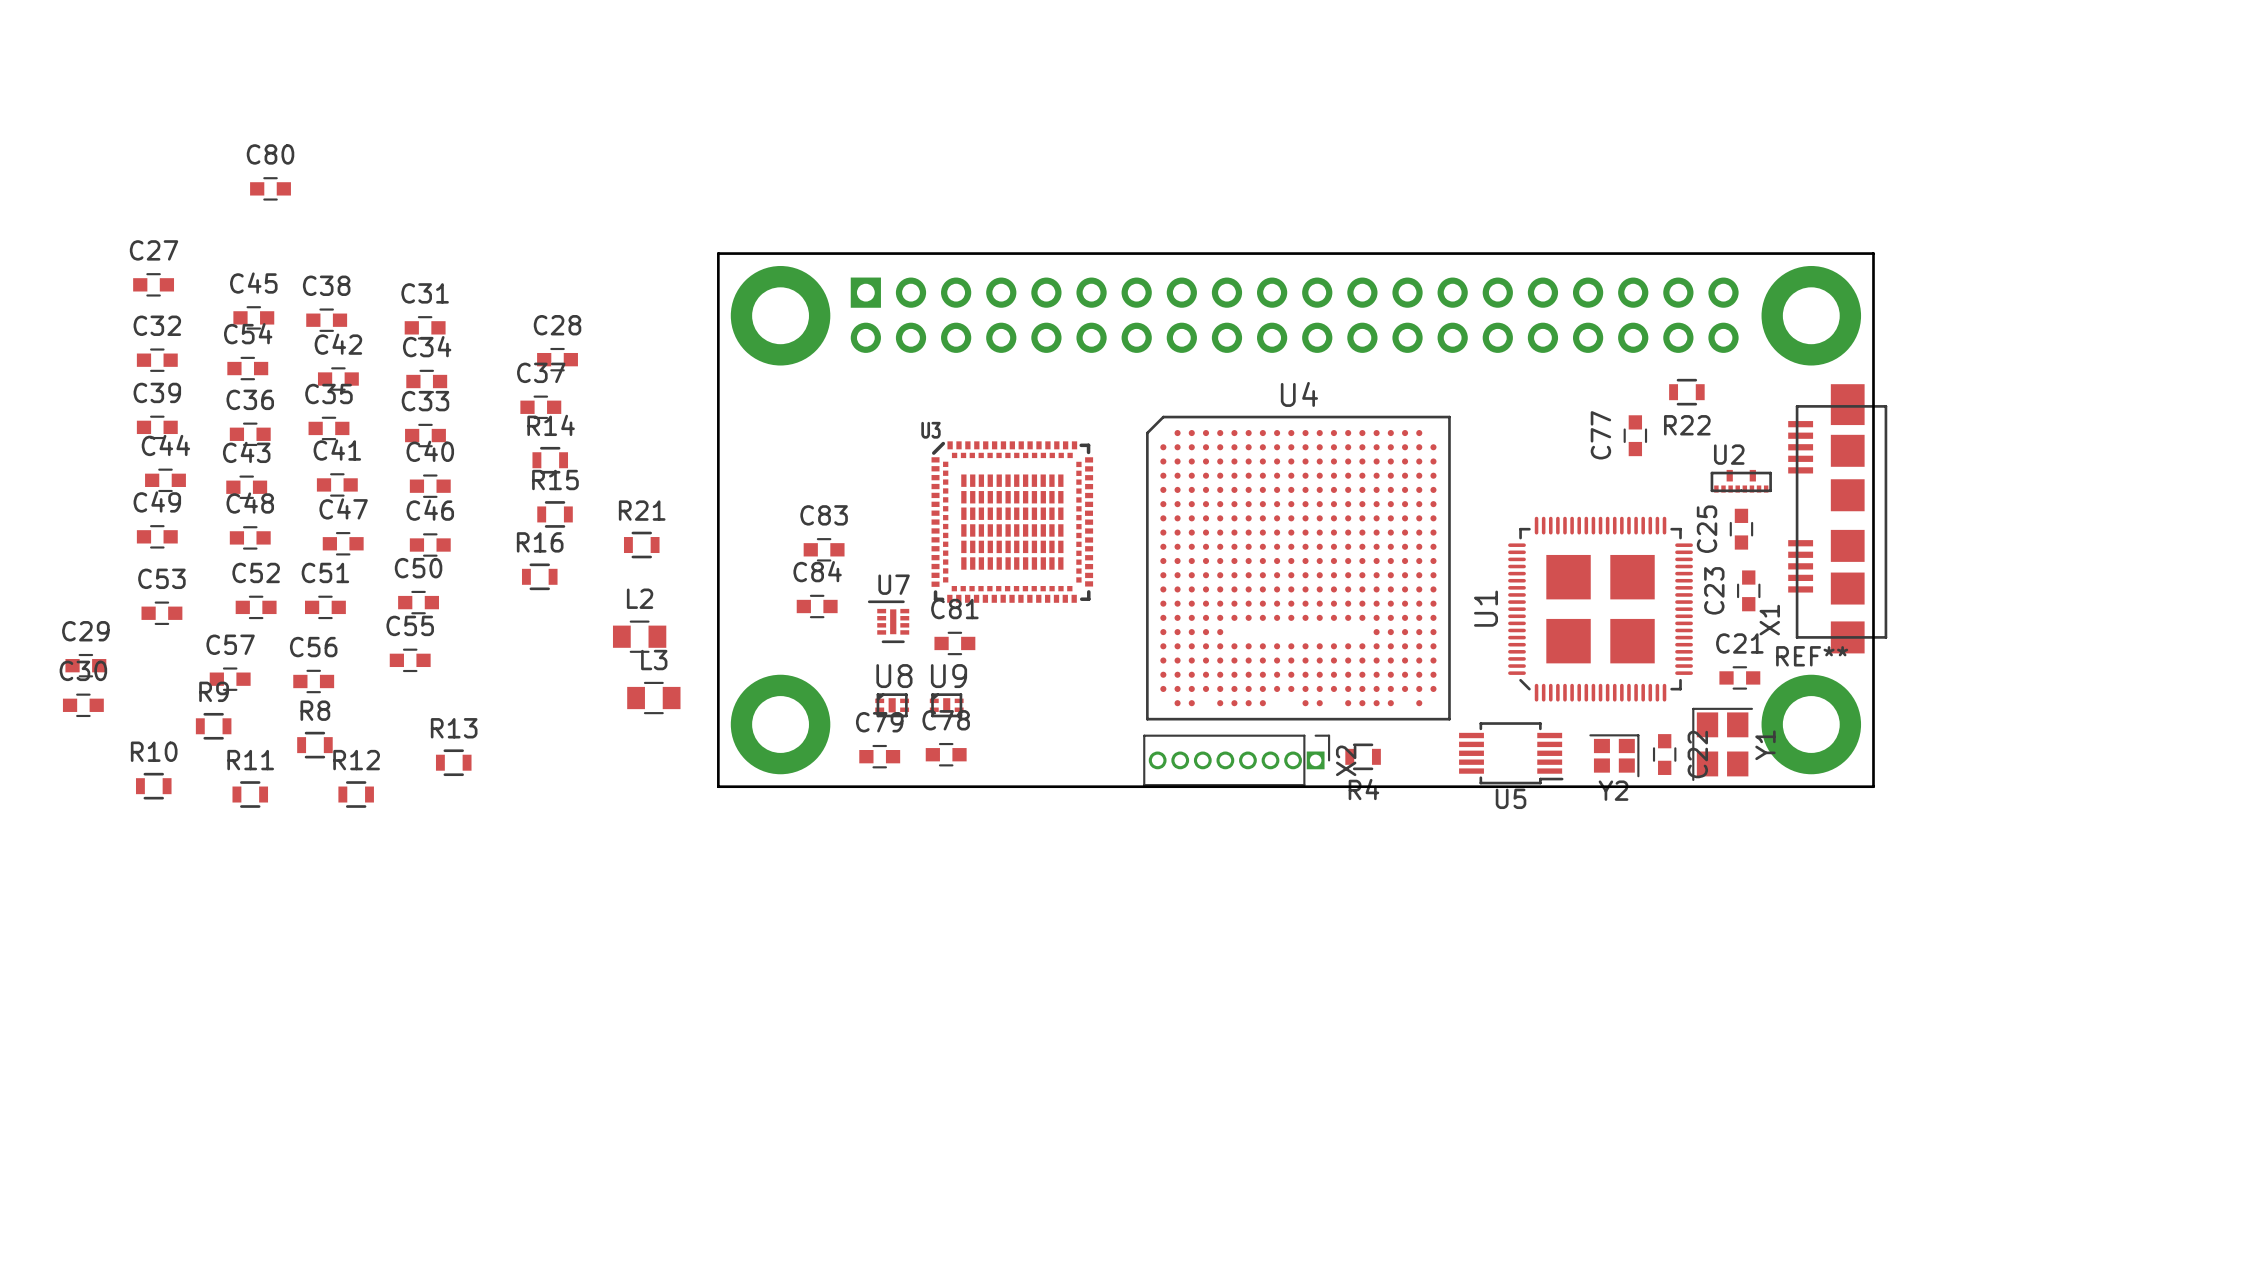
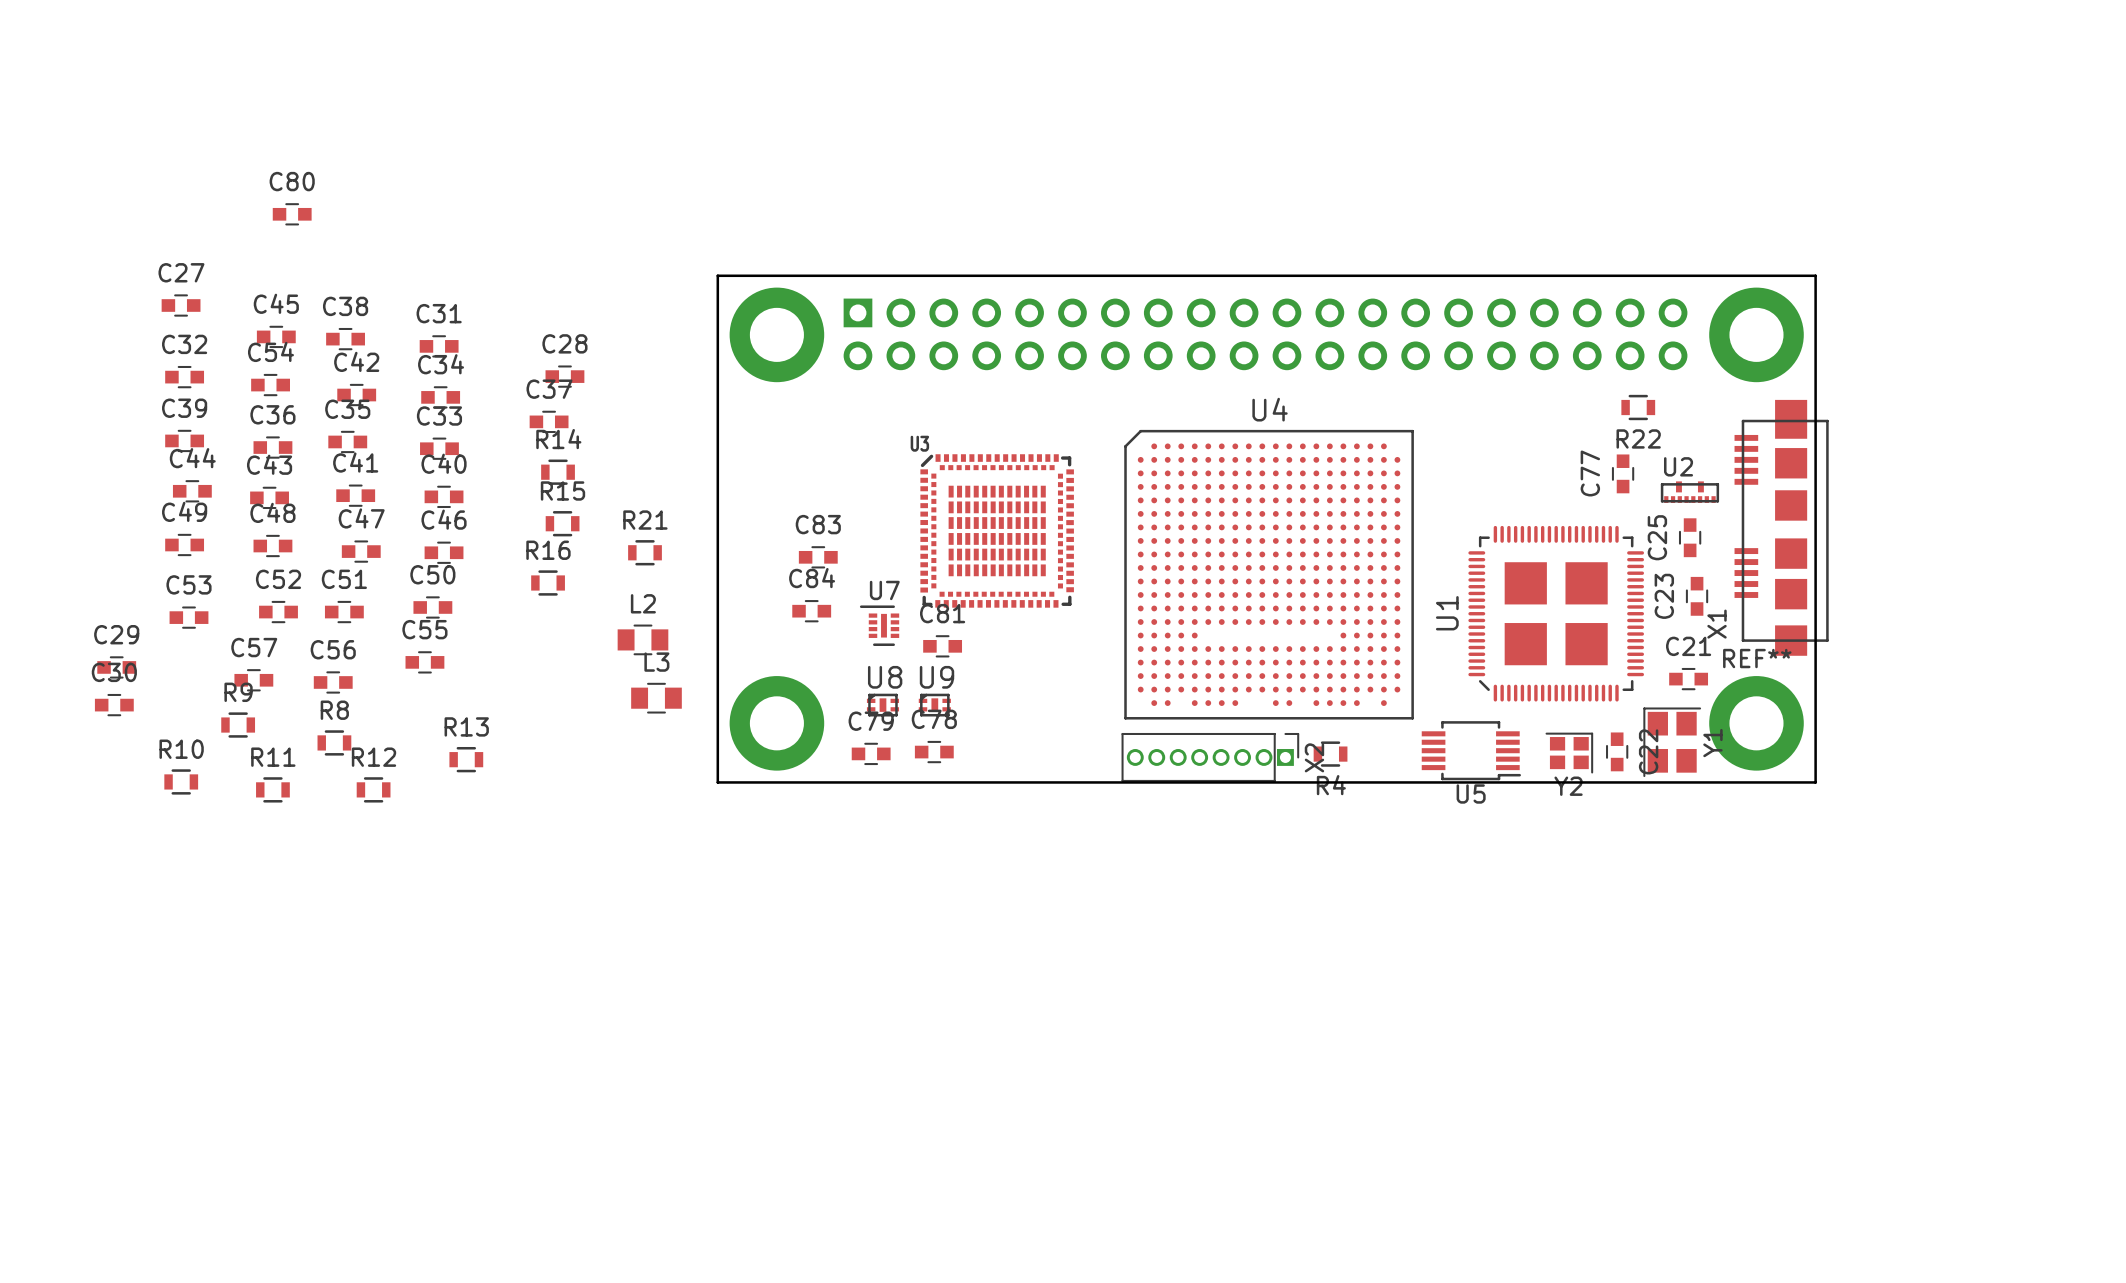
C77 position: (1635, 435) -> (1623, 473)

